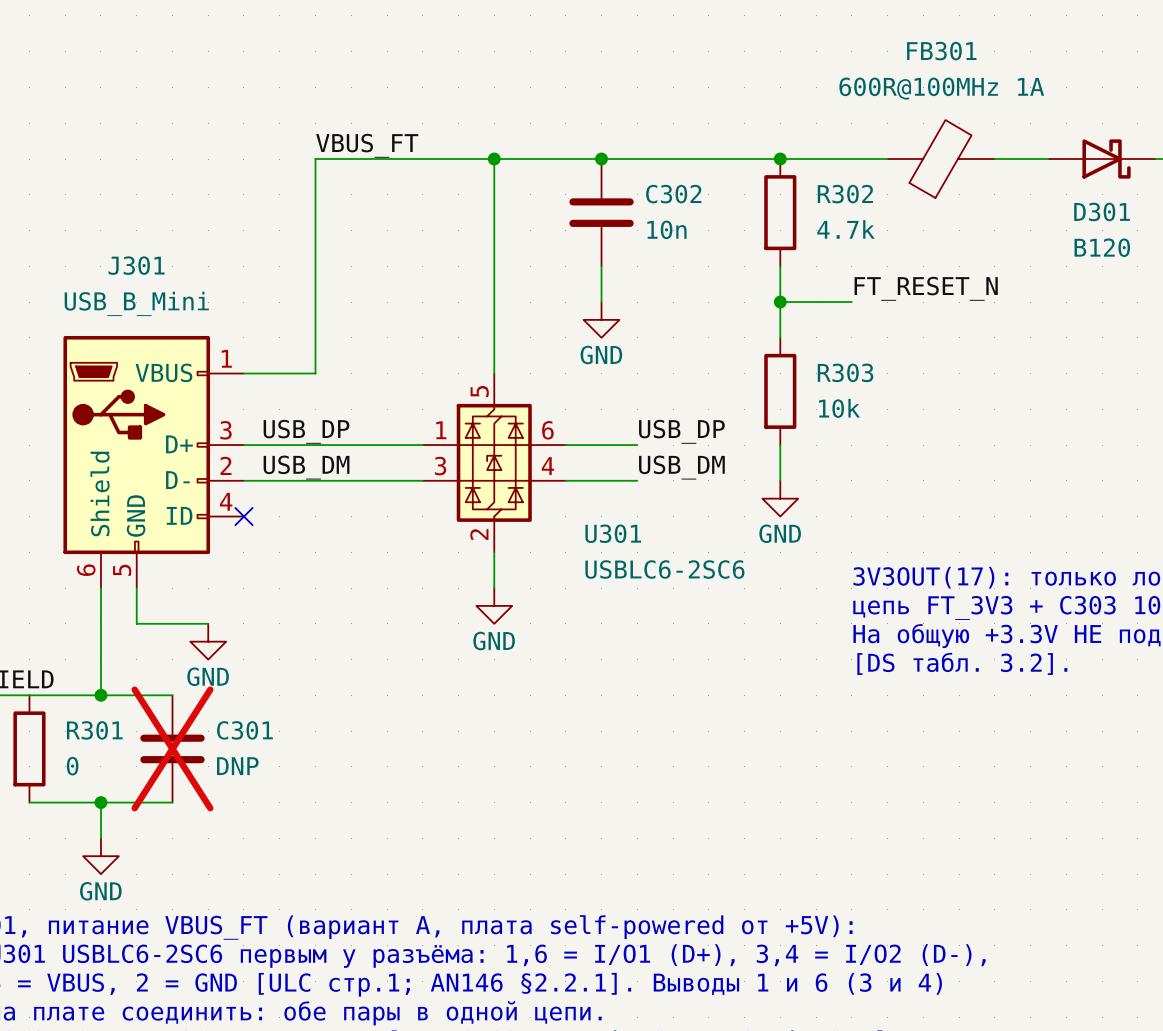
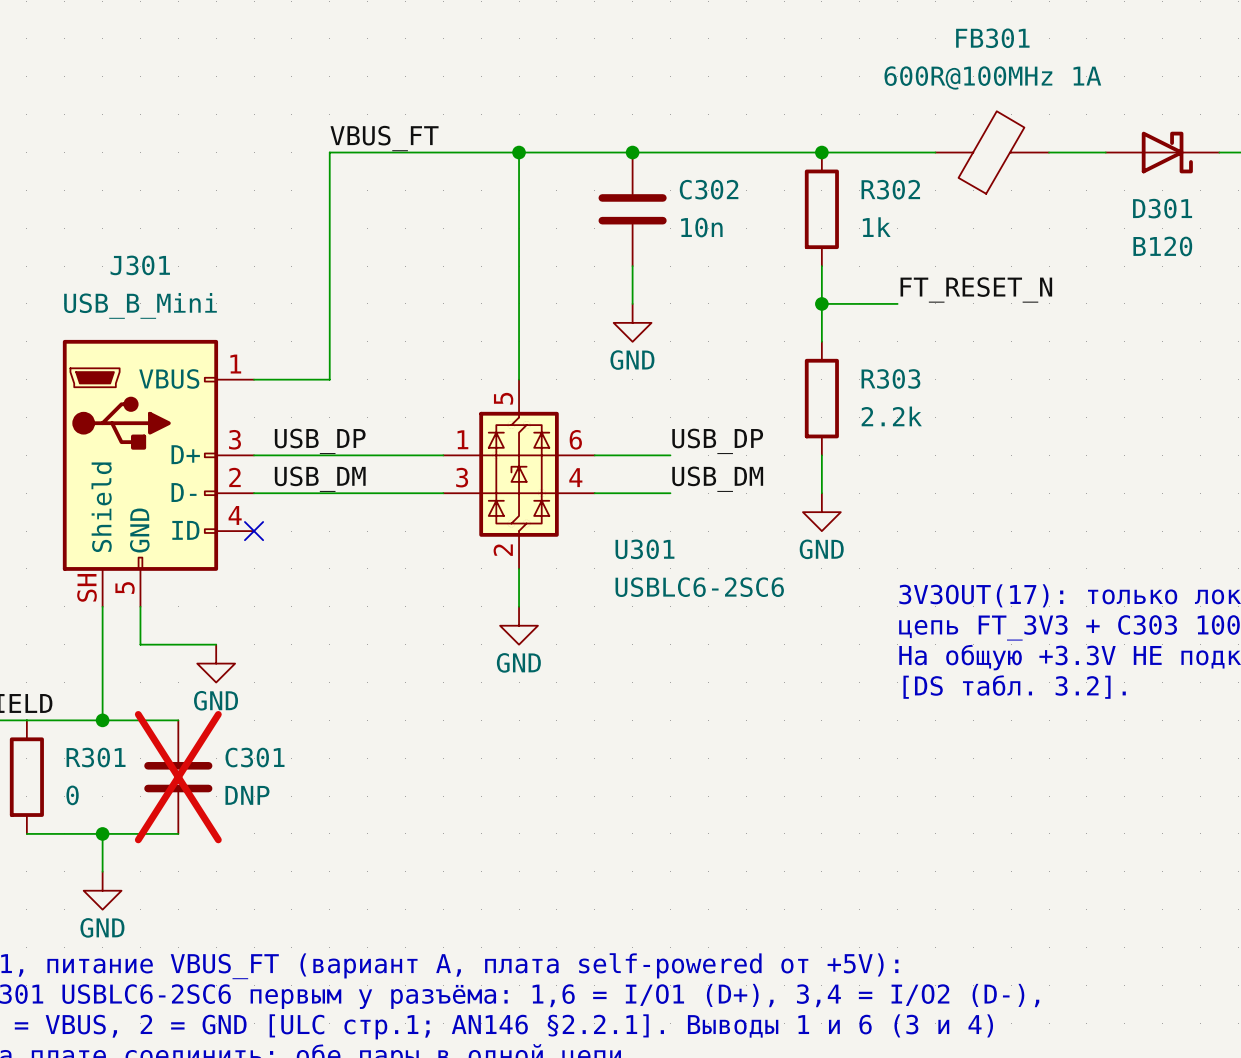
R302 value: 4.7k (846, 229) -> 1k (876, 227)
R303 value: 10k (839, 408) -> 2.2k (891, 416)
J301 pin number: 6 (86, 570) -> SH (87, 587)

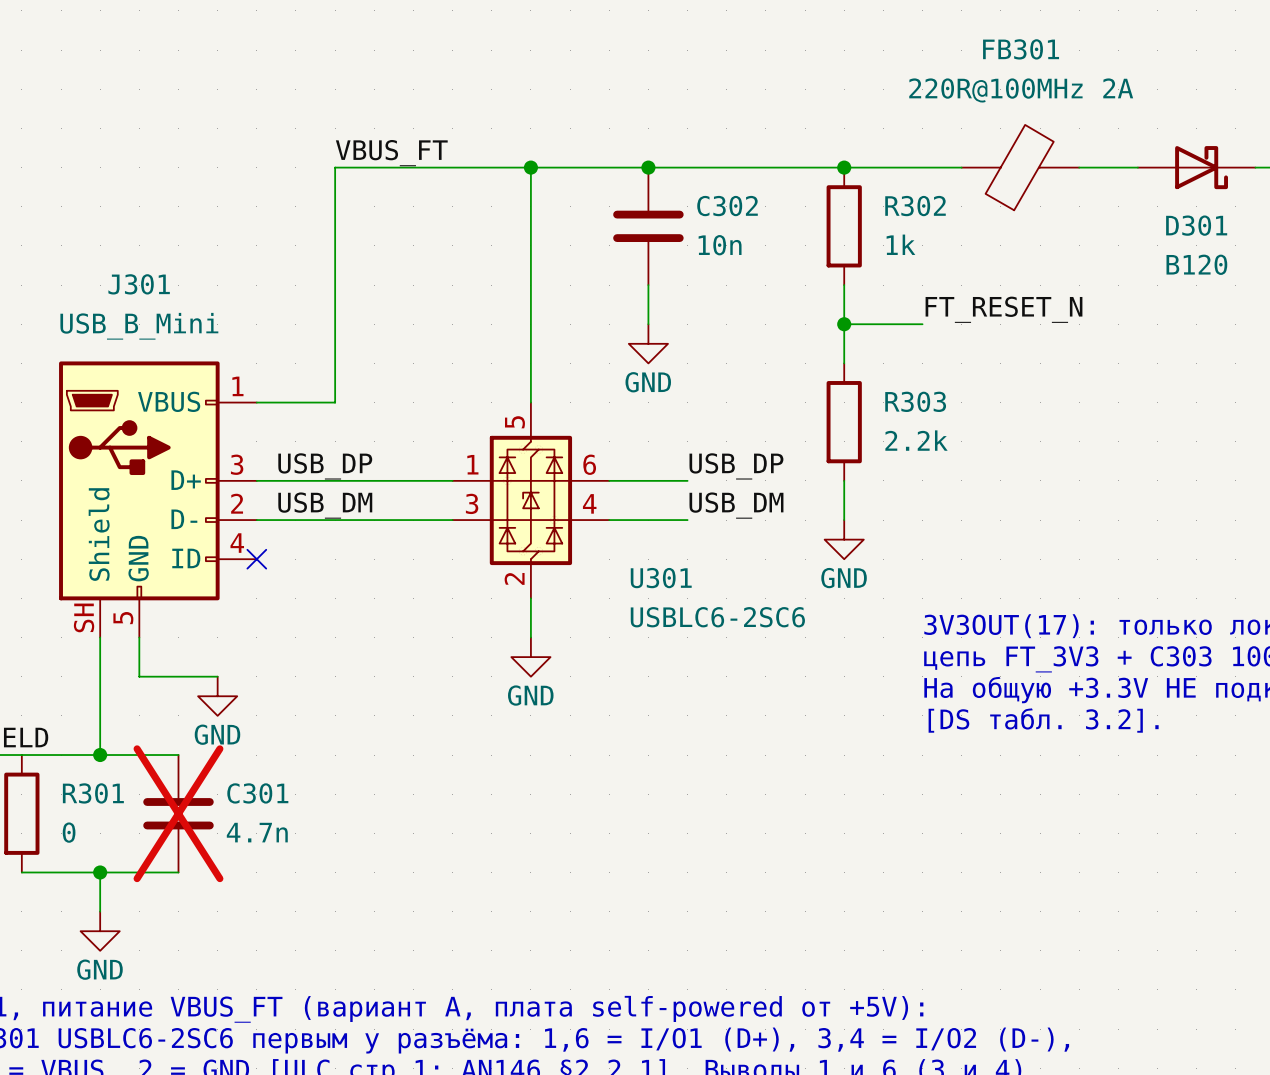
FB301 value: 600R@100MHz 1A (992, 77) -> 220R@100MHz 2A (1021, 90)
C301 value: DNP (247, 795) -> 4.7n (257, 832)

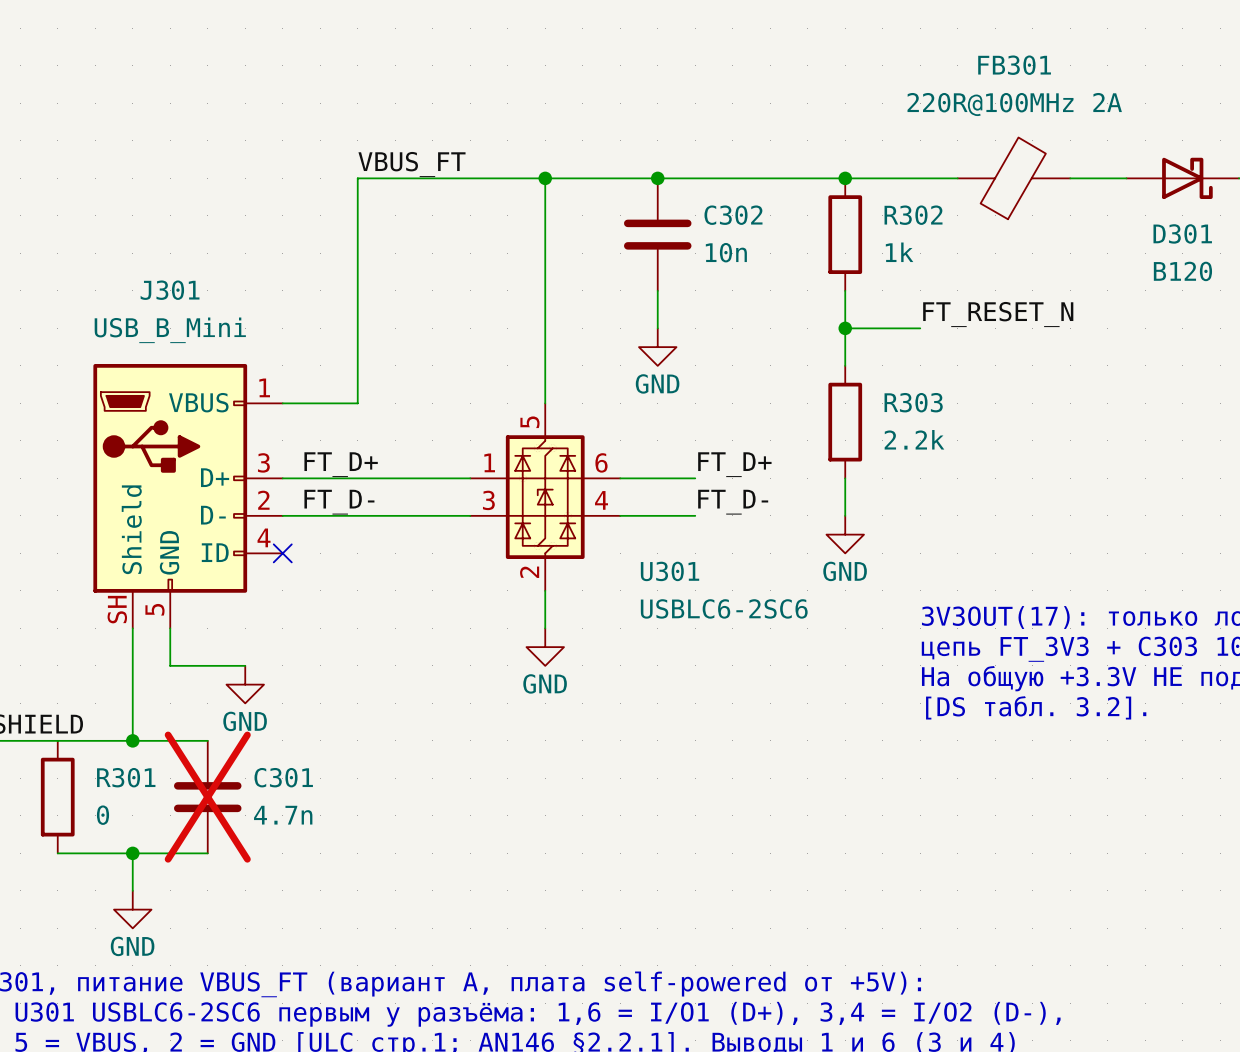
label: USB_DP (325, 466) -> FT_D+ (341, 464)
label: USB_DP (736, 466) -> FT_D+ (734, 464)
label: USB_DM (325, 505) -> FT_D- (339, 502)
label: USB_DM (736, 505) -> FT_D- (733, 502)

